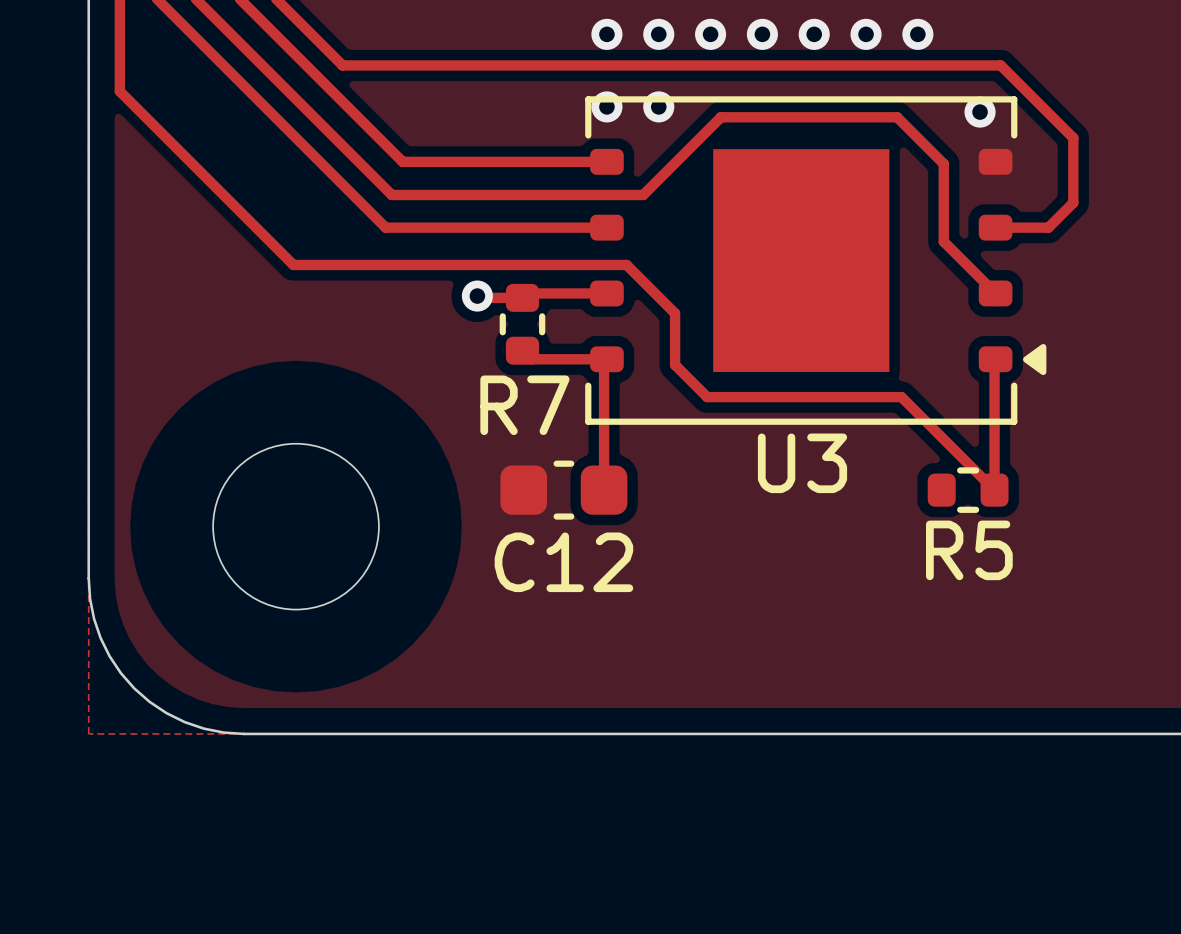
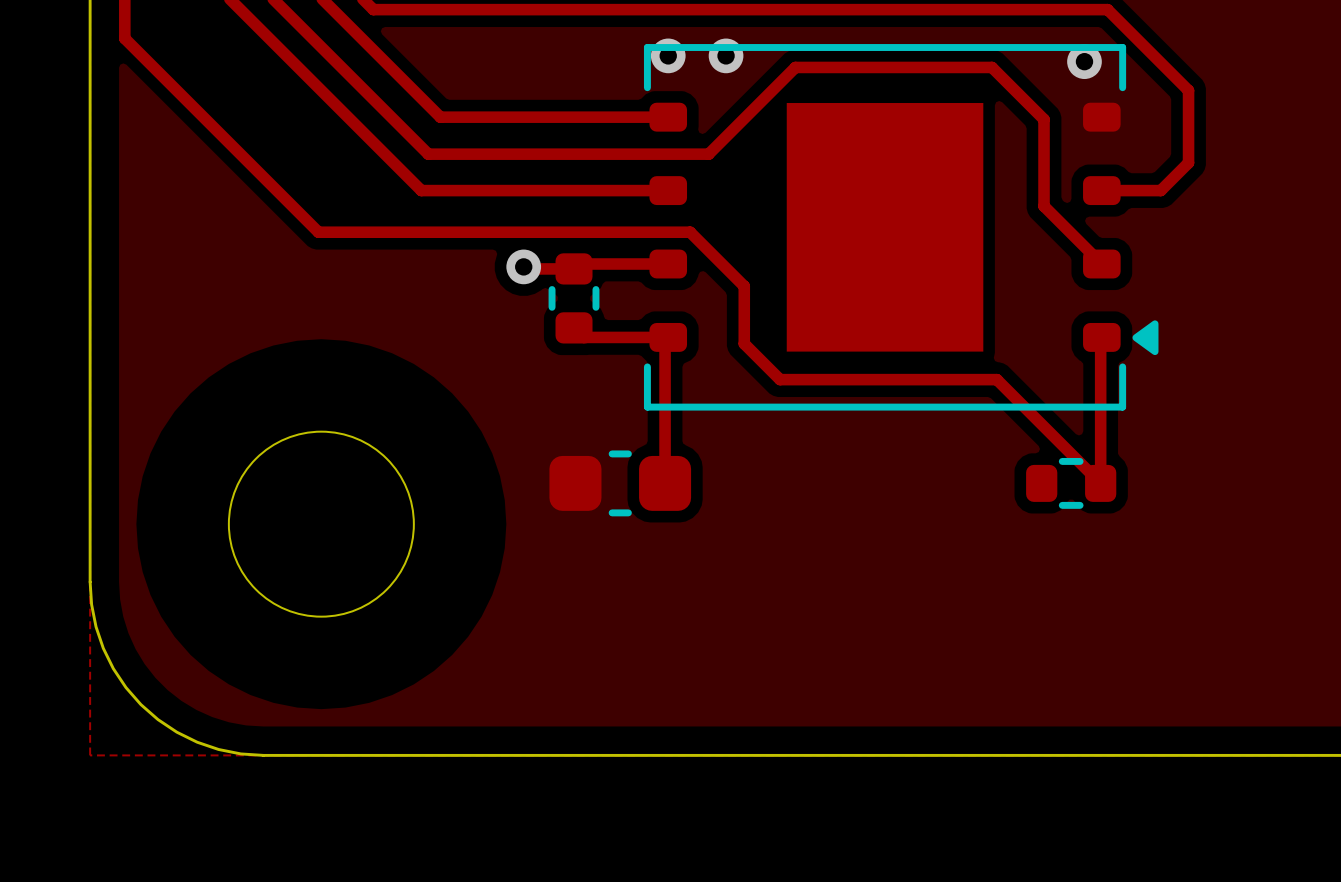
R7 name: R7 (524, 405) -> none
U3 name: U3 (802, 463) -> none
R5 name: R5 (969, 550) -> none
C12 name: C12 (563, 562) -> none

